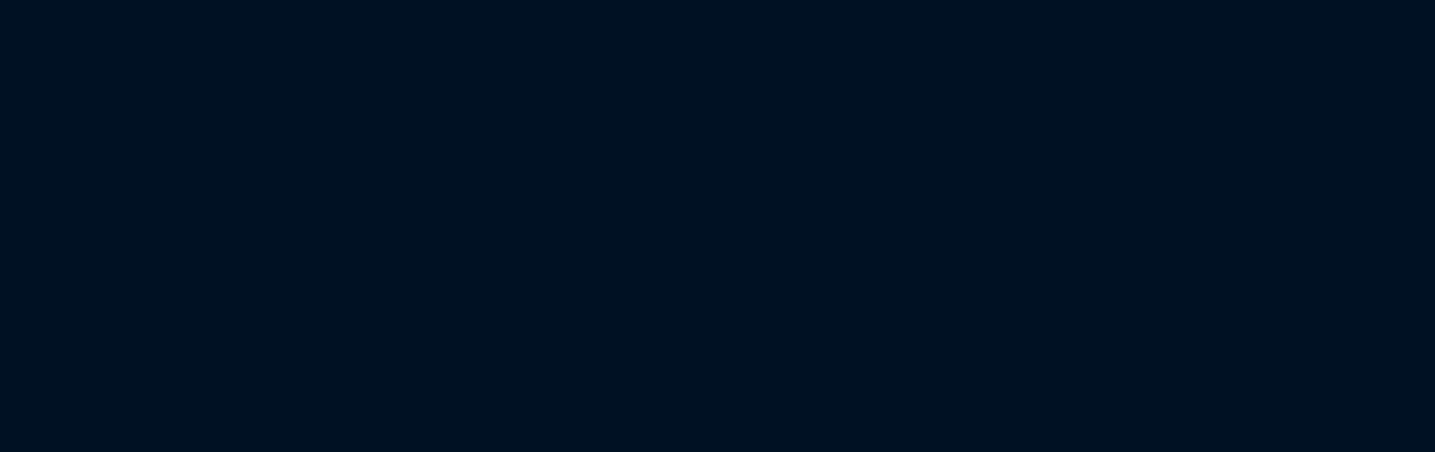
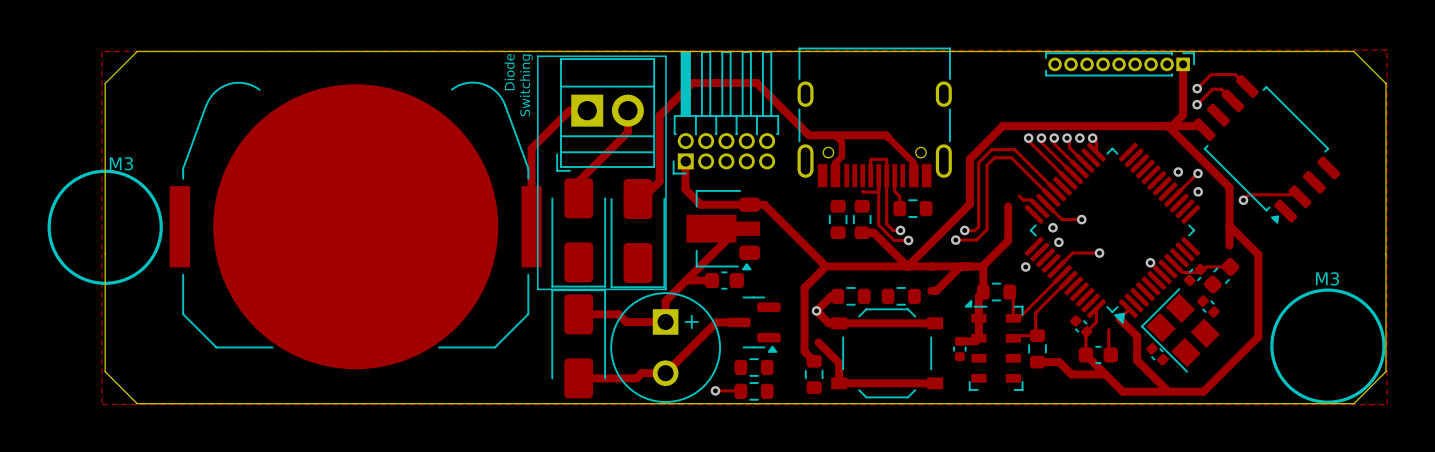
zone outline: none -> (1387, 50) (102, 51) (102, 404) (1387, 404) (1387, 50)
board edge: none -> (137, 51) (105, 83) (105, 371) (137, 403) (1353, 403) (1385, 371) (1385, 83) (1353, 51) (137, 51)
line: none -> (537, 56) (666, 56) (666, 289) (537, 289) (537, 56)
part: none -> (1120, 64)
track: none -> (1183, 64) (1183, 115) (1172, 126)
text: none -> Diode (509, 72)
track: none -> (1247, 86) (1235, 74) (1211, 74) (1197, 88)
text: none -> Switching (526, 85)
via: none -> (1197, 88)
track: none -> (1232, 100) (1221, 89) (1212, 89) (1197, 104)
via: none -> (1197, 104)
track: none -> (587, 110) (569, 110) (531, 148) (531, 226)
track: none -> (627, 110) (627, 132) (579, 181) (579, 200)
part: none -> (725, 112)
part: none -> (605, 114)
part: none -> (874, 117)
track: none -> (1168, 126) (1229, 187) (1229, 245)
track: none -> (1204, 129) (1200, 126) (1002, 126) (969, 159) (969, 204) (907, 266) (873, 232) (862, 232)
track: none -> (834, 135) (841, 142) (841, 156) (835, 163) (835, 175)
track: none -> (1028, 138) (1028, 140) (1068, 180)
via: none -> (1028, 138)
track: none -> (1041, 138) (1041, 142) (1073, 174)
via: none -> (1041, 138)
track: none -> (1054, 138) (1054, 143) (1079, 169)
via: none -> (1054, 138)
track: none -> (1067, 138) (1069, 140) (1069, 147) (1085, 163)
via: none -> (1067, 138)
via: none -> (1079, 138)
track: none -> (1092, 138) (1096, 141) (1096, 152)
via: none -> (1092, 138)
part: none -> (1266, 149)
track: none -> (685, 161) (685, 189) (700, 204) (764, 204) (826, 266)
text: none -> M3 (121, 163)
drawing: none -> [47, 169, 163, 285]
via: none -> (1178, 172)
track: none -> (1198, 173) (1173, 197)
via: none -> (1198, 173)
track: none -> (870, 175) (870, 160) (885, 159) (886, 224) (893, 230) (900, 230)
track: none -> (878, 175) (878, 225) (894, 240) (908, 240)
track: none -> (894, 175) (894, 191) (899, 196) (899, 208)
track: none -> (913, 175) (913, 163) (886, 135) (809, 135) (756, 83) (692, 83) (659, 115) (659, 181) (638, 202)
track: none -> (862, 191) (878, 191)
track: none -> (1056, 191) (1014, 149) (991, 149) (978, 162) (978, 226) (974, 230) (964, 230)
via: none -> (1198, 191)
track: none -> (1019, 196) (1023, 200) (1031, 200) (1039, 208)
track: none -> (1300, 196) (1298, 194) (1248, 194) (1243, 200)
track: none -> (1051, 197) (1011, 157) (994, 157) (987, 165) (987, 229) (976, 240) (955, 240)
via: none -> (1243, 200)
track: none -> (1045, 203) (1062, 219) (1081, 219)
track: none -> (1008, 206) (1008, 240) (982, 266)
part: none -> (912, 208)
part: none -> (838, 219)
part: none -> (862, 219)
via: none -> (1081, 219)
part: none -> (355, 225)
track: none -> (1229, 225) (1258, 254) (1258, 336) (1203, 391) (1122, 391) (1085, 354)
via: none -> (1052, 227)
track: none -> (738, 228) (665, 301) (665, 321)
part: none -> (723, 230)
via: none -> (900, 230)
via: none -> (964, 230)
part: none -> (578, 232)
part: none -> (637, 233)
part: none -> (1112, 233)
via: none -> (908, 240)
via: none -> (955, 240)
via: none -> (1058, 242)
track: none -> (1099, 253) (1072, 253) (1056, 269)
via: none -> (1099, 253)
via: none -> (1150, 262)
track: none -> (1173, 263) (1182, 272) (1200, 272) (1206, 266) (1230, 266)
track: none -> (826, 266) (804, 287) (804, 351) (814, 361)
track: none -> (826, 266) (982, 266)
track: none -> (960, 266) (936, 290) (931, 290)
track: none -> (982, 266) (983, 292) (978, 296) (978, 338) (975, 341) (959, 341)
via: none -> (1025, 266)
track: none -> (1062, 274) (1018, 318) (1013, 318) (1013, 295) (1009, 292)
part: none -> (1195, 274)
part: none -> (1221, 275)
text: none -> M3 (1327, 278)
track: none -> (686, 280) (711, 280)
part: none -> (724, 280)
track: none -> (1068, 280) (1035, 312) (1035, 333) (1037, 335) (1015, 335) (1013, 338)
drawing: none -> [1270, 288, 1386, 404]
part: none -> (996, 292)
track: none -> (837, 296) (831, 296) (816, 310) (828, 323) (935, 323)
part: none -> (851, 296)
part: none -> (901, 296)
part: none -> (1208, 306)
track: none -> (1096, 308) (1096, 322) (1085, 332) (1087, 354)
track: none -> (1128, 308) (1119, 318) (1137, 336) (1137, 360) (1168, 391)
via: none -> (816, 310)
track: none -> (578, 314) (618, 314) (626, 322) (665, 322)
track: none -> (738, 322) (716, 322) (665, 373) (641, 373) (636, 378) (578, 378)
part: none -> (753, 324)
part: none -> (1081, 326)
track: none -> (1108, 329) (1108, 351) (1111, 354)
part: none -> (1180, 330)
track: none -> (818, 342) (839, 363) (839, 383) (935, 383)
part: none -> (578, 343)
part: none -> (994, 345)
part: none -> (665, 347)
part: none -> (1037, 348)
part: none -> (959, 349)
part: none -> (887, 353)
part: none -> (1098, 354)
part: none -> (1157, 354)
track: none -> (1037, 362) (1059, 362) (1071, 374) (1105, 374)
part: none -> (754, 367)
part: none -> (814, 374)
track: none -> (715, 390) (740, 391)
via: none -> (715, 390)
part: none -> (754, 391)

